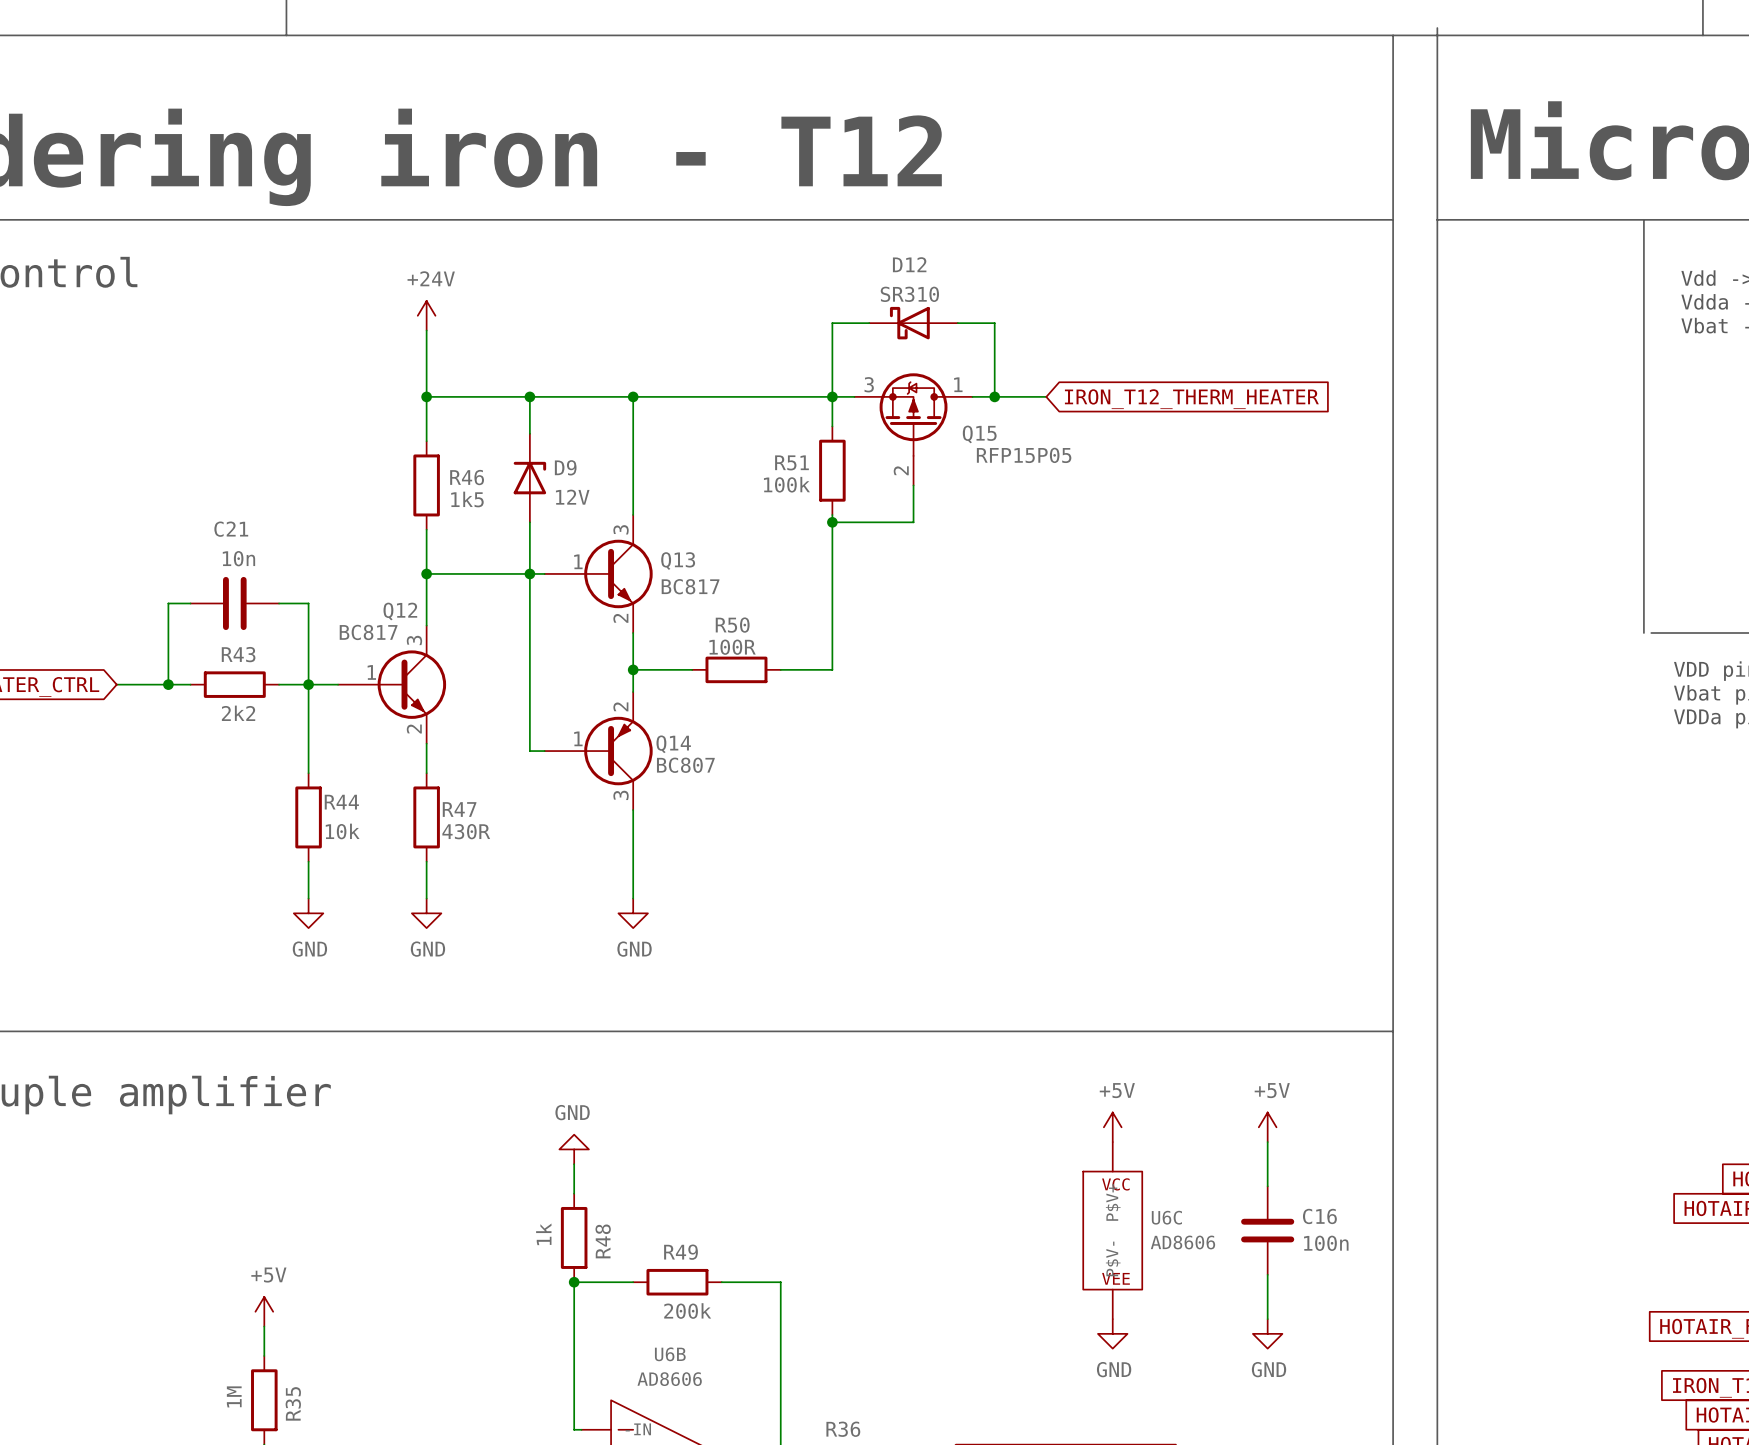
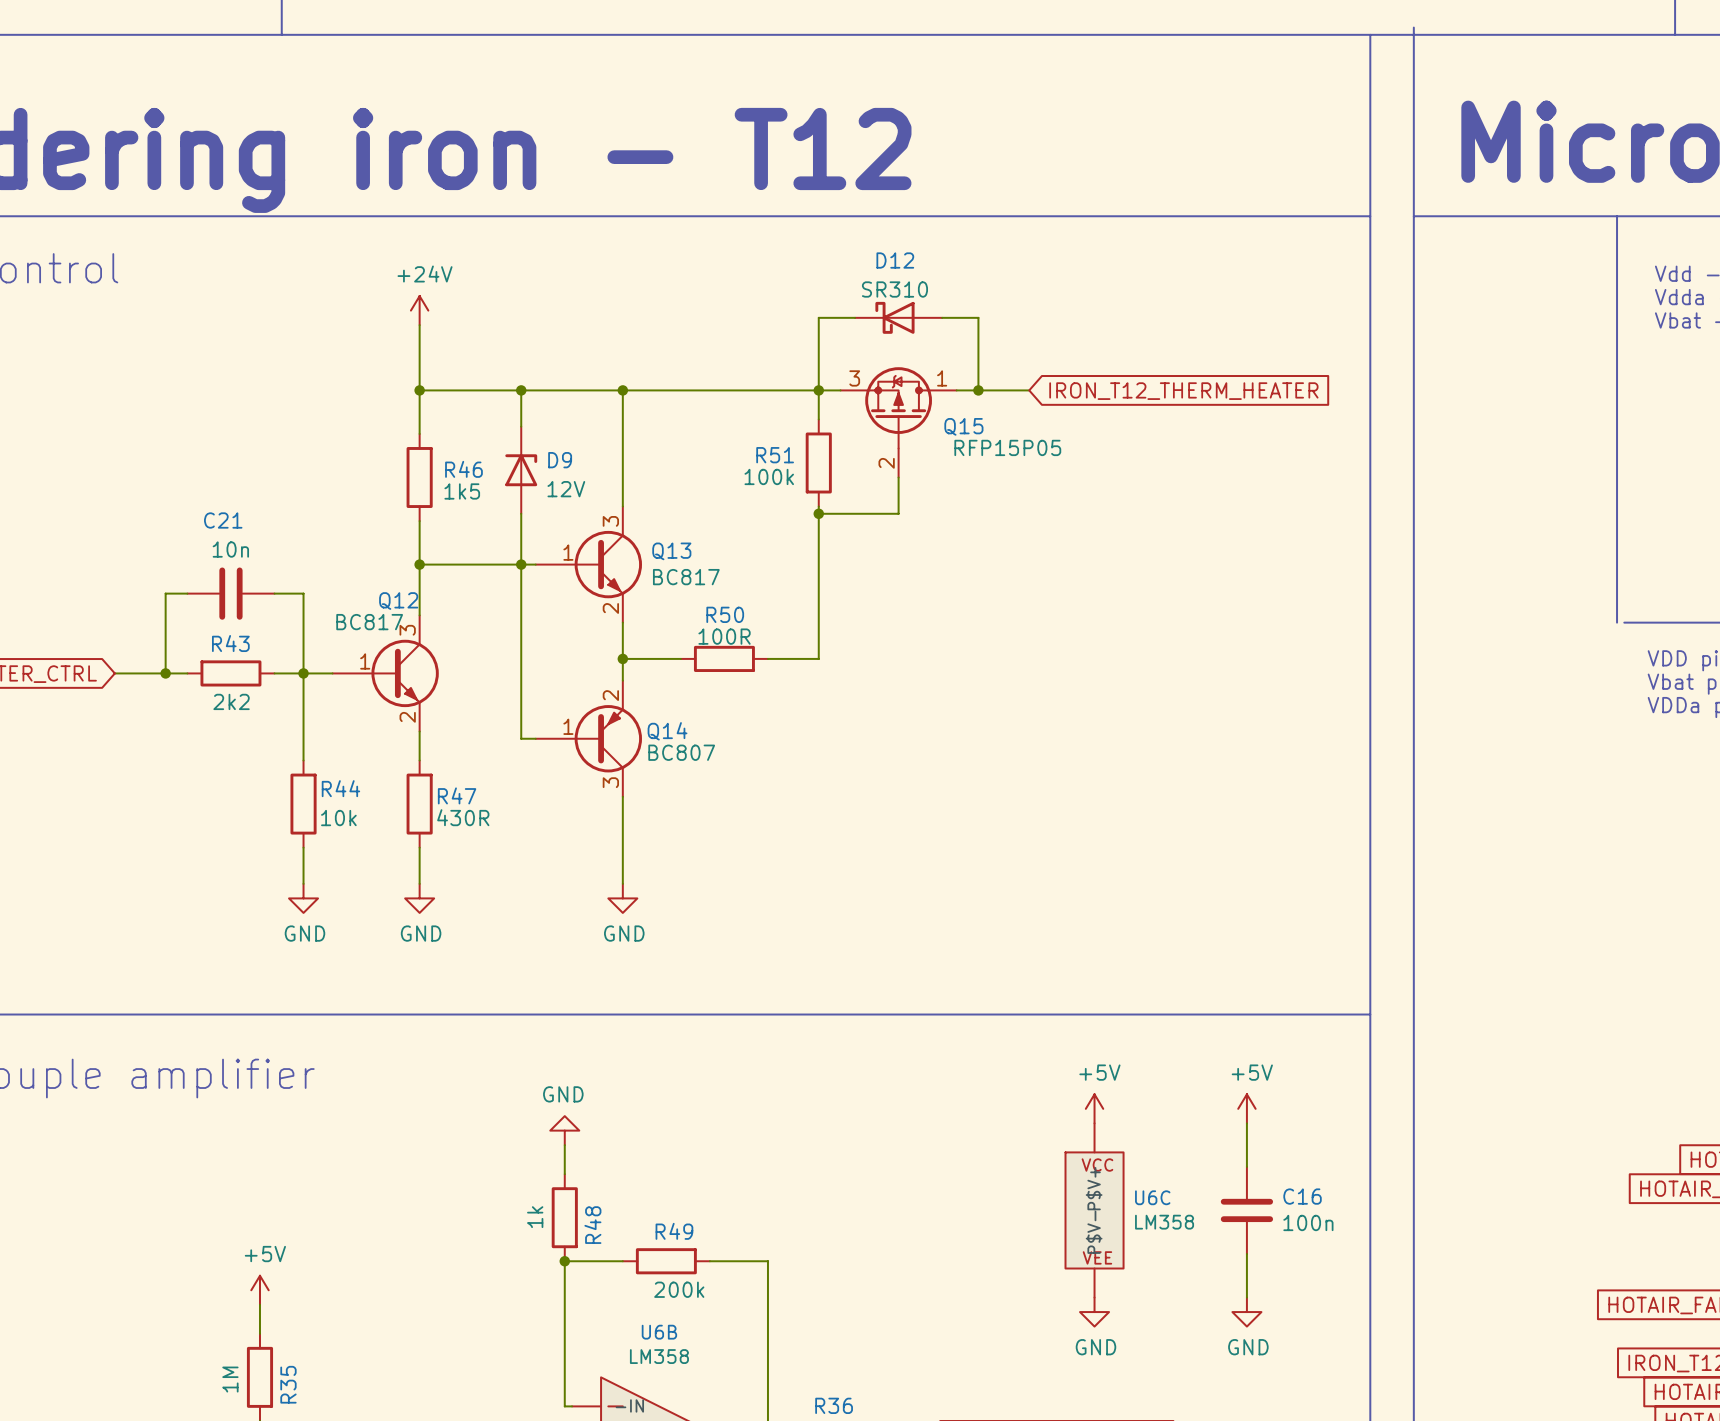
U6C value: AD8606 (1182, 1242) -> LM358 (1164, 1222)
U6B value: AD8606 (669, 1379) -> LM358 (659, 1356)

